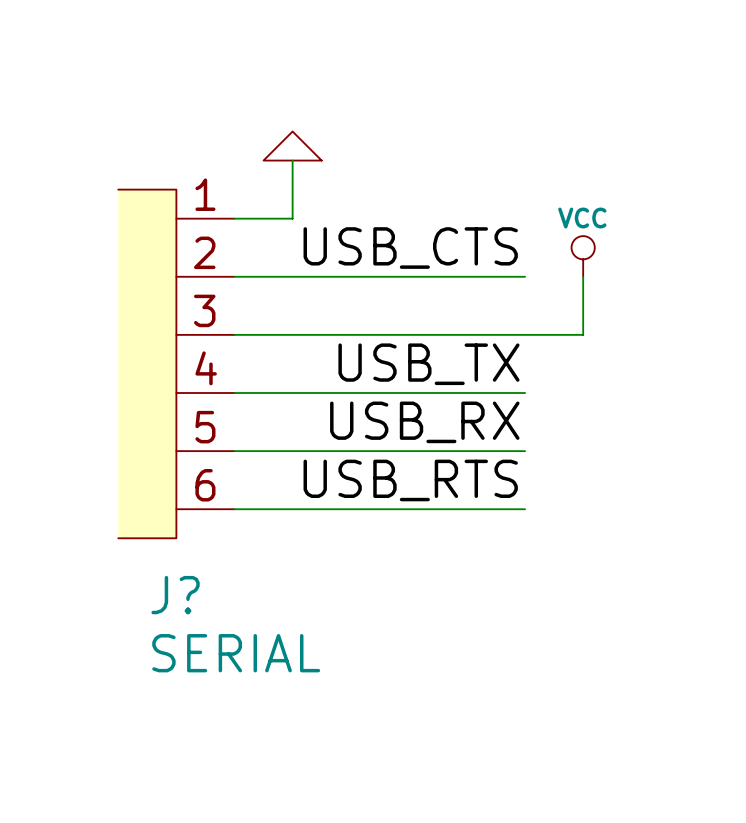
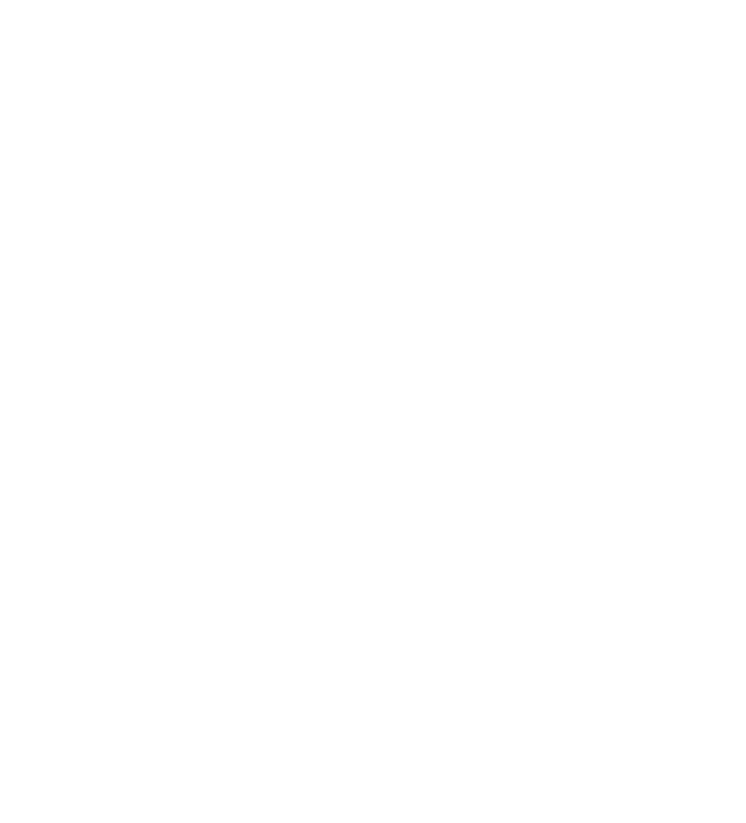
power symbol: (292, 146) -> none
wire: (292, 160) (292, 218) (234, 218) -> none
label: USB_CTS (410, 248) -> none
power symbol: VCC (583, 256) -> none
wire: (234, 276) (525, 276) -> none
wire: (583, 276) (583, 334) (234, 334) -> none
J?: SERIAL (176, 363) -> none
label: USB_TX (428, 364) -> none
wire: (234, 393) (525, 393) -> none
label: USB_RX (424, 422) -> none
wire: (234, 451) (525, 451) -> none
label: USB_RTS (410, 480) -> none
wire: (234, 509) (525, 509) -> none

